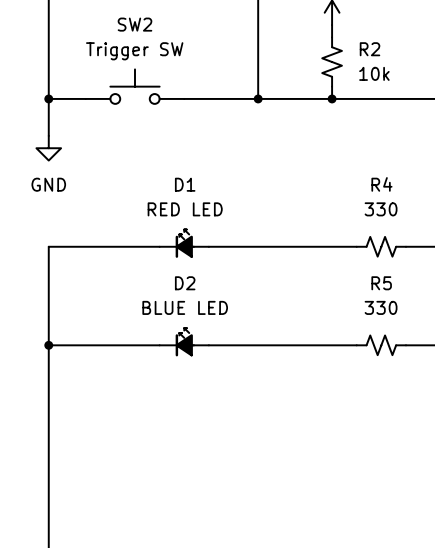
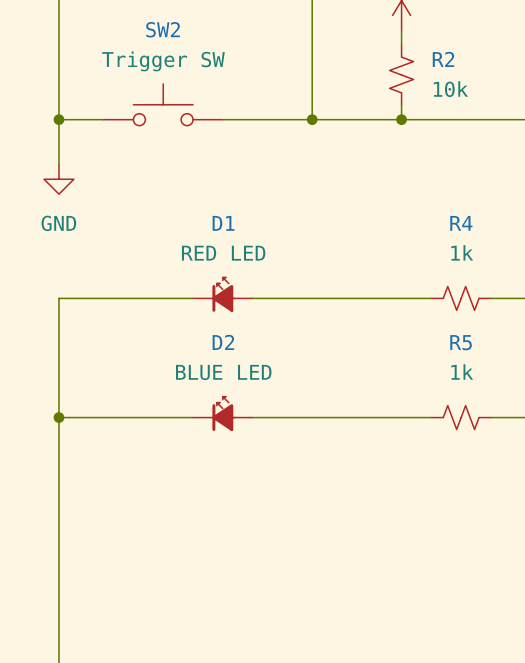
R4 value: 330 (381, 209) -> 1k (462, 252)
R5 value: 330 (381, 307) -> 1k (462, 372)

